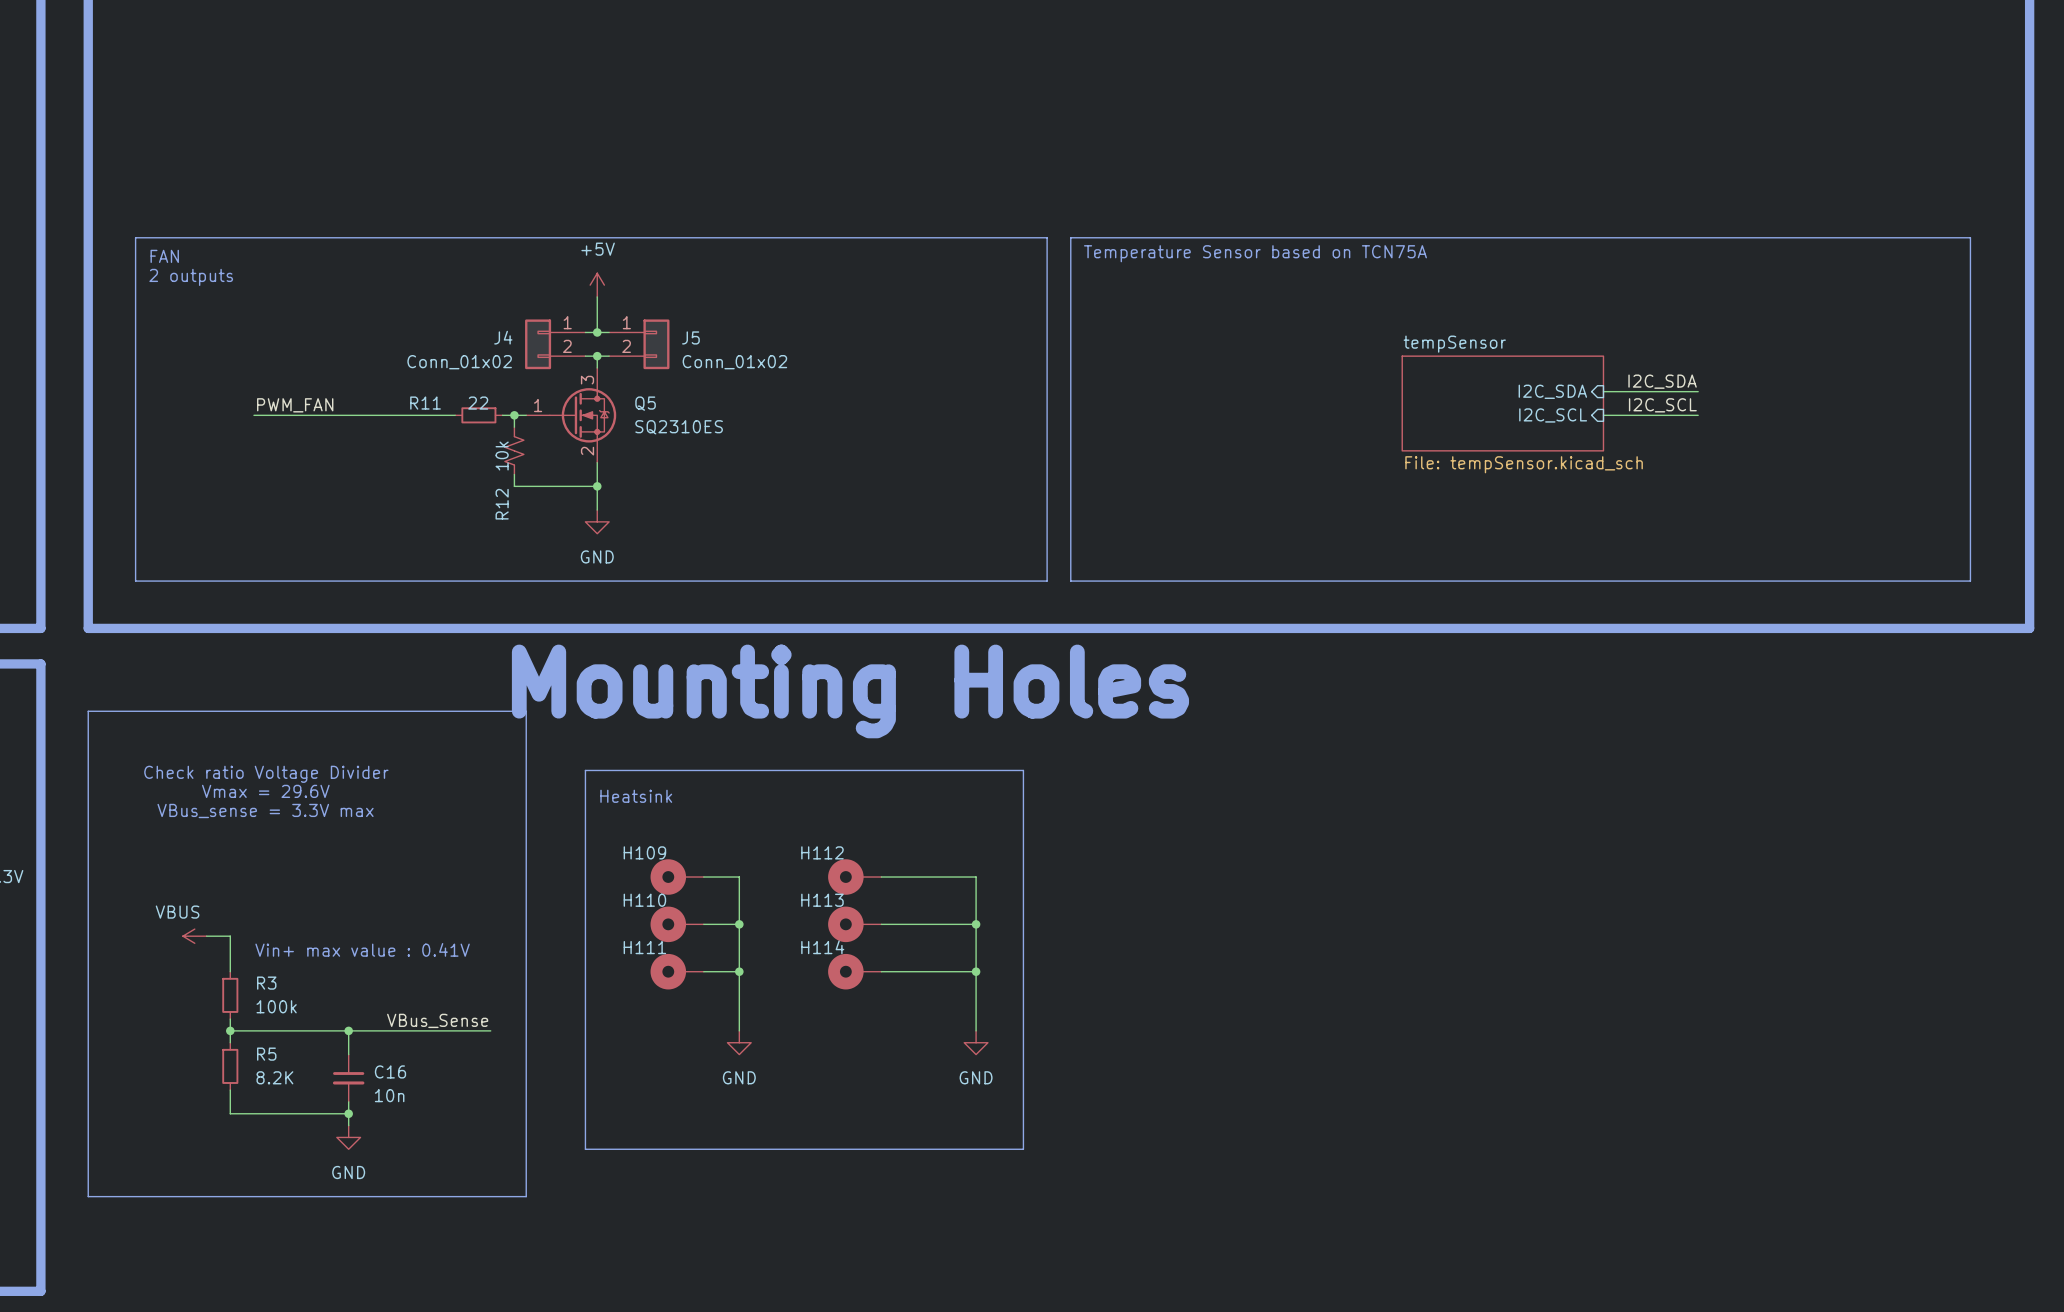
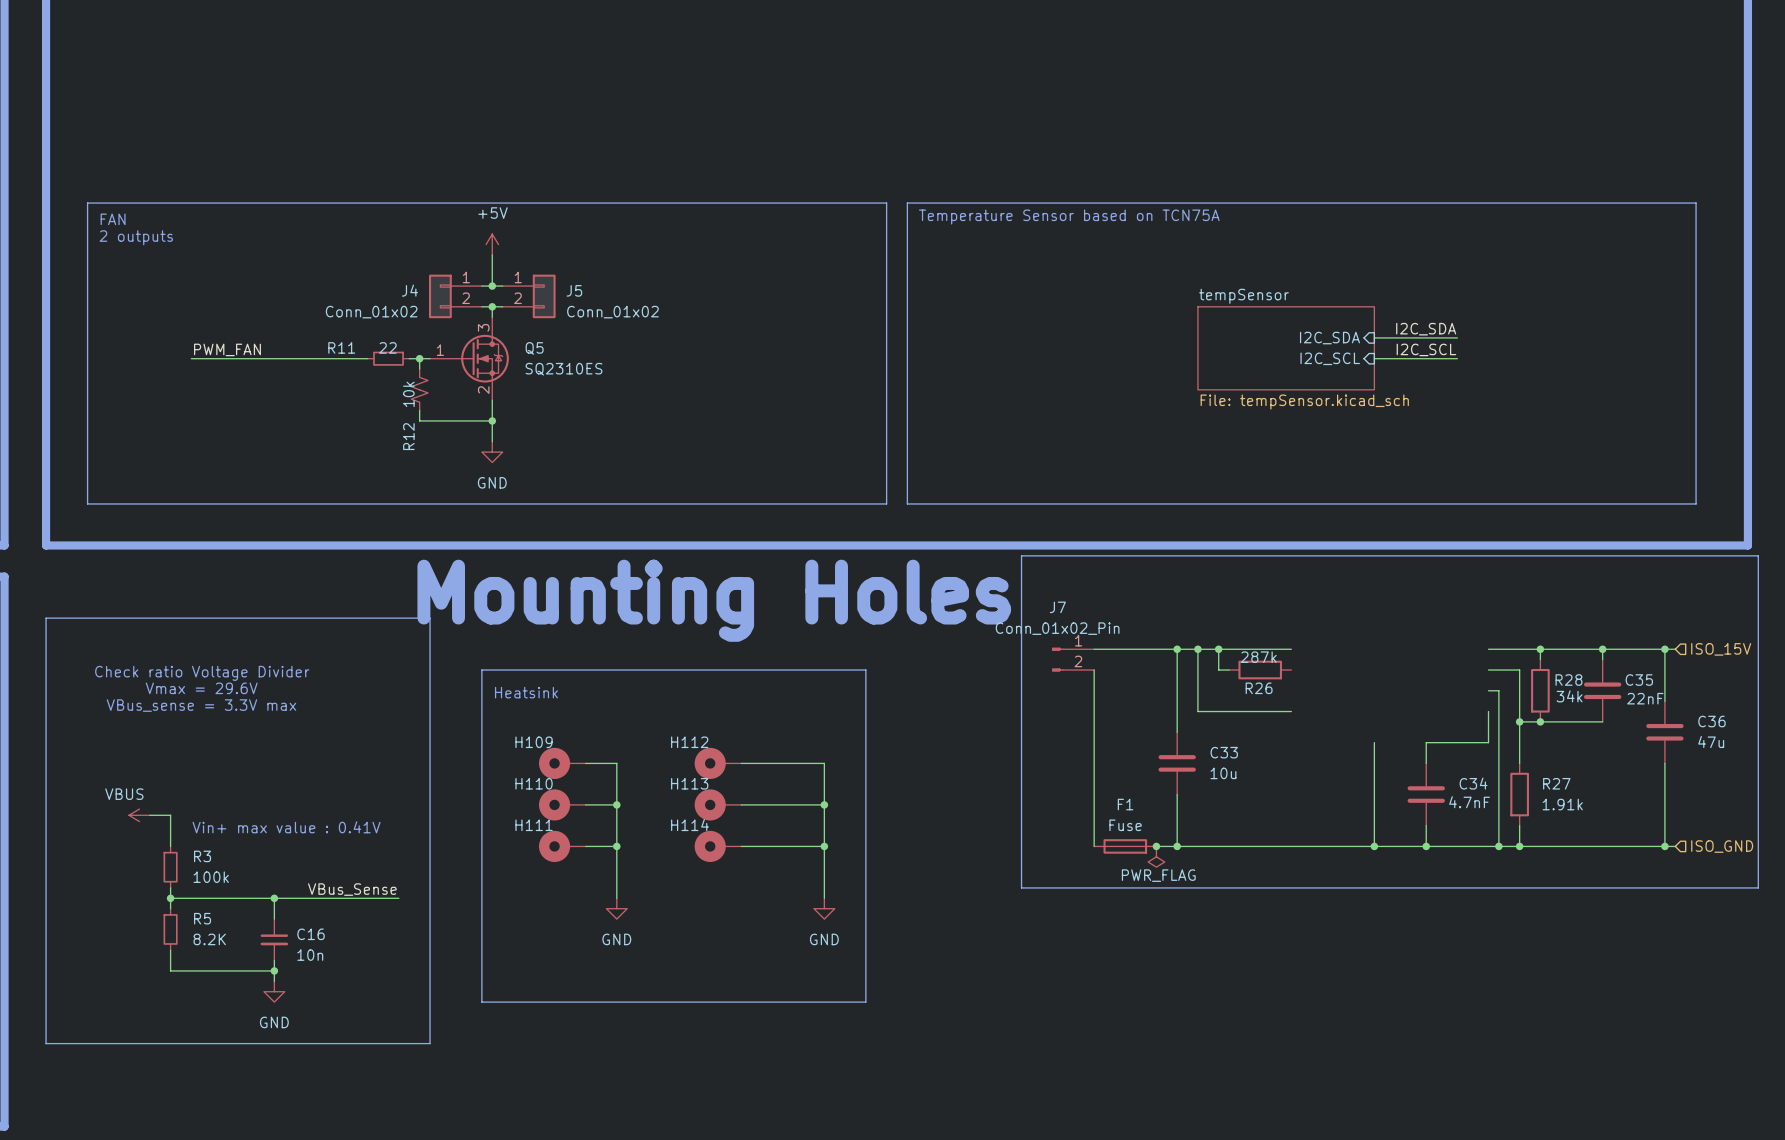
line: none -> (1021, 555) (1758, 555) (1758, 887) (1021, 887) (1021, 555)
wire: none -> (1094, 649) (1291, 649)
wire: none -> (1177, 649) (1177, 732)
junction: none -> (1177, 649)
wire: none -> (1197, 649) (1197, 711) (1291, 711)
junction: none -> (1197, 649)
wire: none -> (1218, 649) (1218, 670) (1229, 670)
junction: none -> (1218, 649)
wire: none -> (1488, 649) (1675, 649)
wire: none -> (1540, 649) (1540, 659)
junction: none -> (1540, 649)
wire: none -> (1602, 649) (1602, 659)
junction: none -> (1602, 649)
wire: none -> (1664, 649) (1664, 701)
junction: none -> (1664, 649)
hierarchical label: none -> ISO_15V (1721, 649)
J7: none -> Conn_01x02_Pin (1073, 659)
wire: none -> (1094, 670) (1094, 846)
R26: none -> 287k (1260, 670)
wire: none -> (1488, 670) (1519, 670) (1519, 763)
wire: none -> (1488, 690) (1498, 690) (1498, 846)
R28: none -> 34k (1540, 690)
C35: none -> 22nF (1602, 690)
wire: none -> (1488, 711) (1488, 742) (1426, 742) (1426, 763)
wire: none -> (1519, 721) (1602, 721)
junction: none -> (1519, 721)
junction: none -> (1540, 721)
C36: none -> 47u (1664, 732)
wire: none -> (1374, 742) (1374, 846)
C33: none -> 10u (1177, 763)
wire: none -> (1664, 763) (1664, 846)
wire: none -> (1177, 794) (1177, 846)
C34: none -> 4.7nF (1426, 794)
R27: none -> 1.91k (1519, 794)
wire: none -> (1426, 825) (1426, 846)
wire: none -> (1519, 825) (1519, 846)
F1: none -> Fuse (1125, 846)
wire: none -> (1156, 846) (1675, 846)
junction: none -> (1156, 846)
junction: none -> (1177, 846)
junction: none -> (1374, 846)
junction: none -> (1426, 846)
junction: none -> (1498, 846)
junction: none -> (1519, 846)
junction: none -> (1664, 846)
hierarchical label: none -> ISO_GND (1722, 846)
power symbol: none -> PWR_FLAG (1156, 856)

